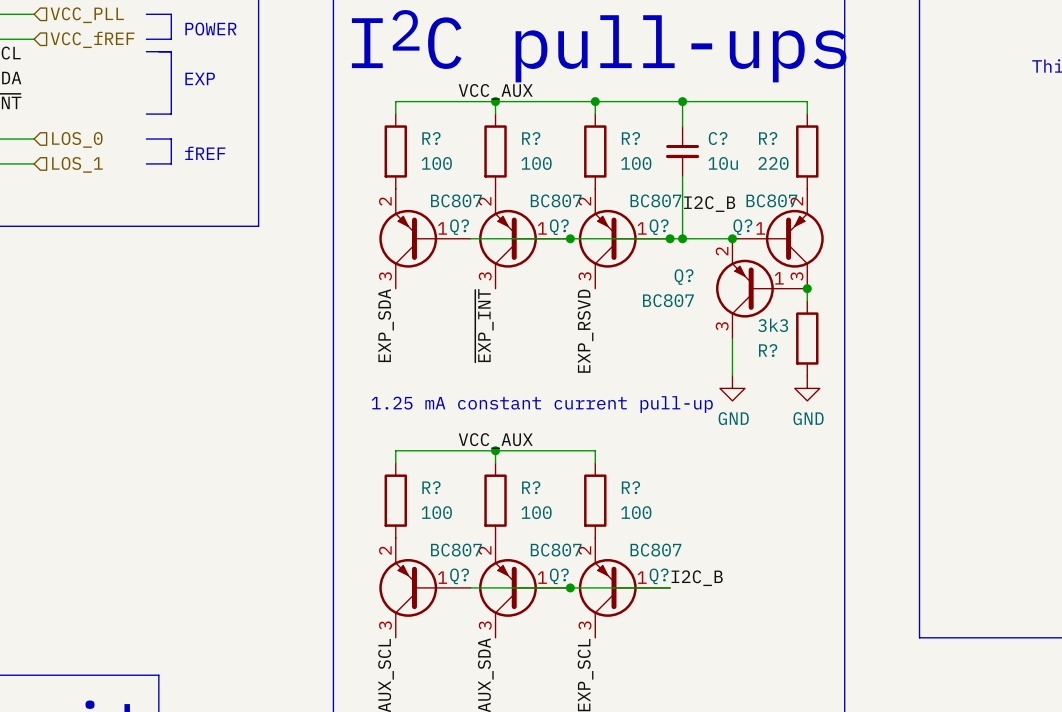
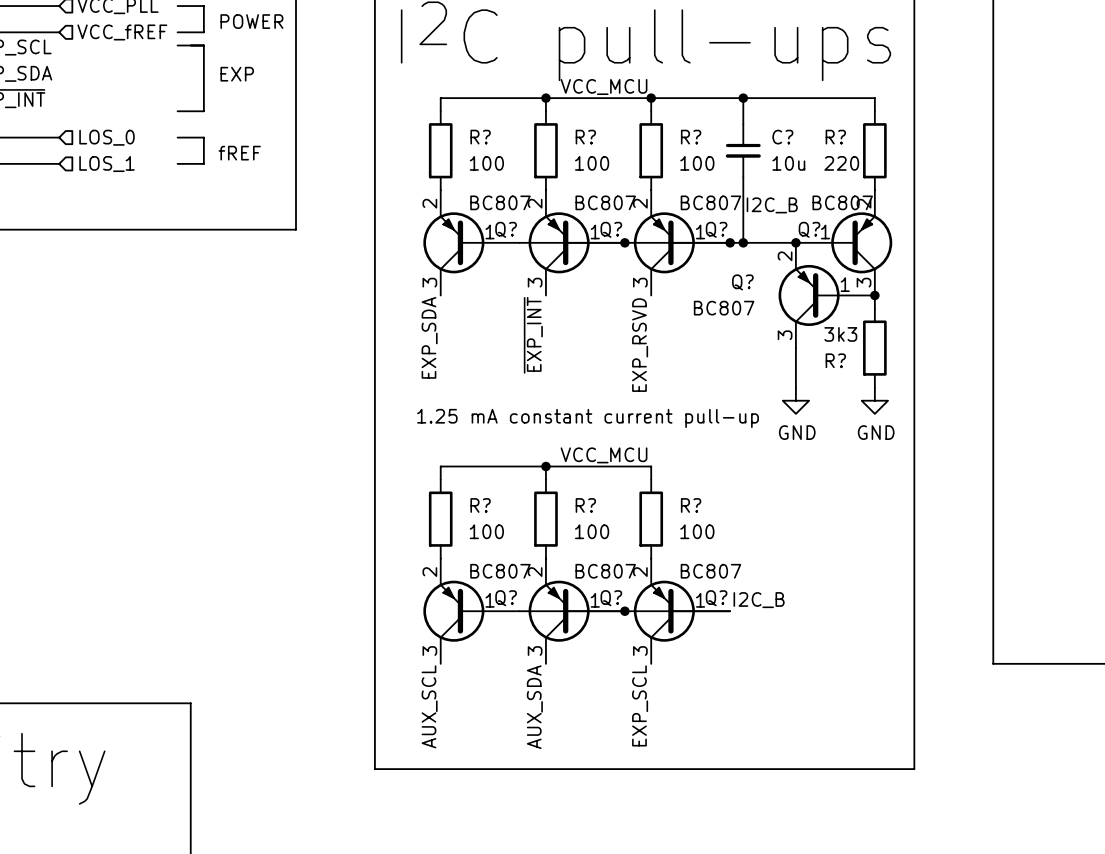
label: VCC_AUX (495, 91) -> VCC_MCU (604, 87)
label: VCC_AUX (495, 441) -> VCC_MCU (604, 455)

